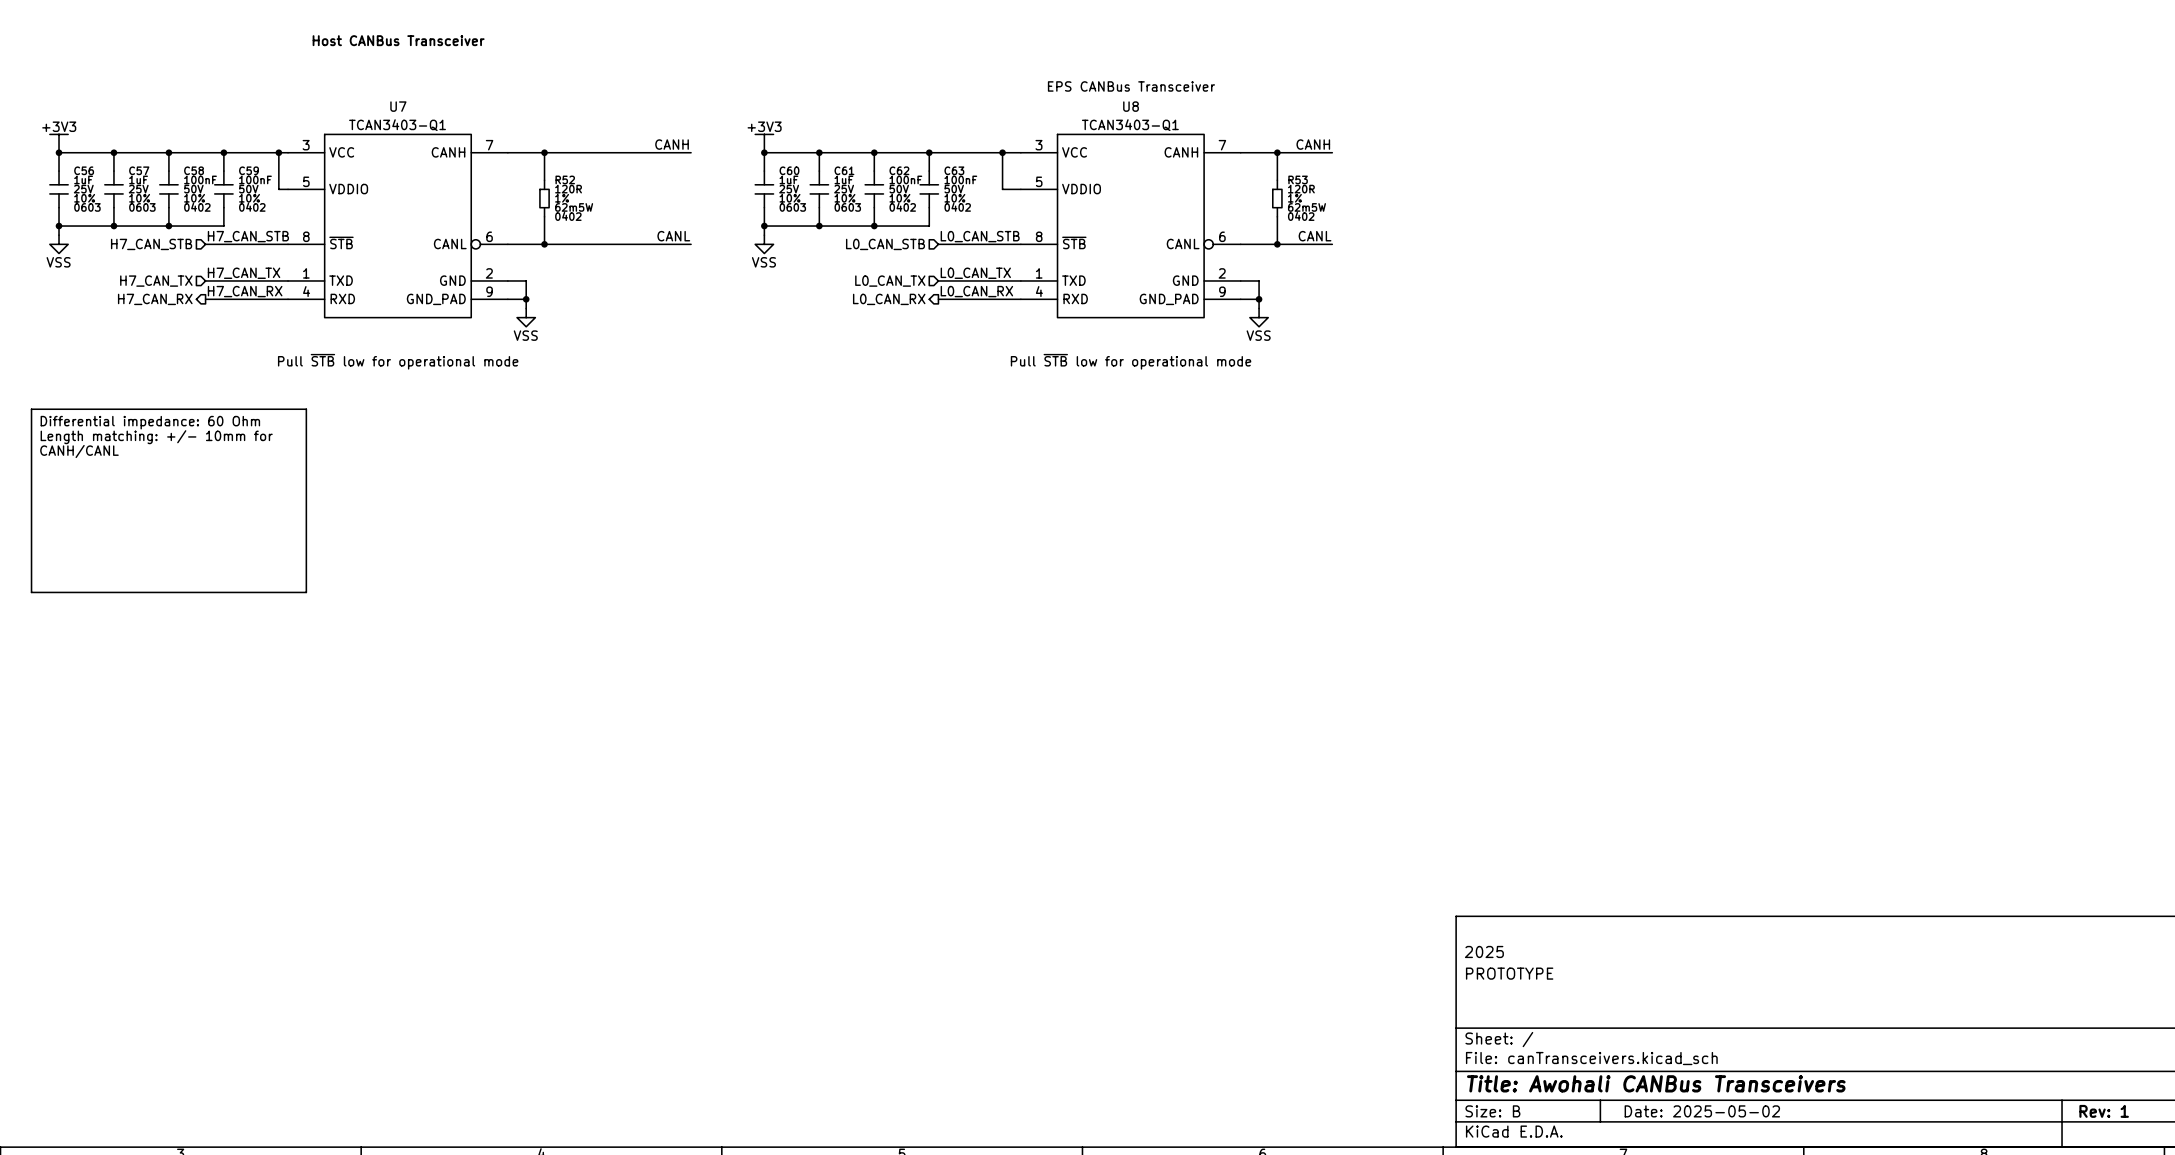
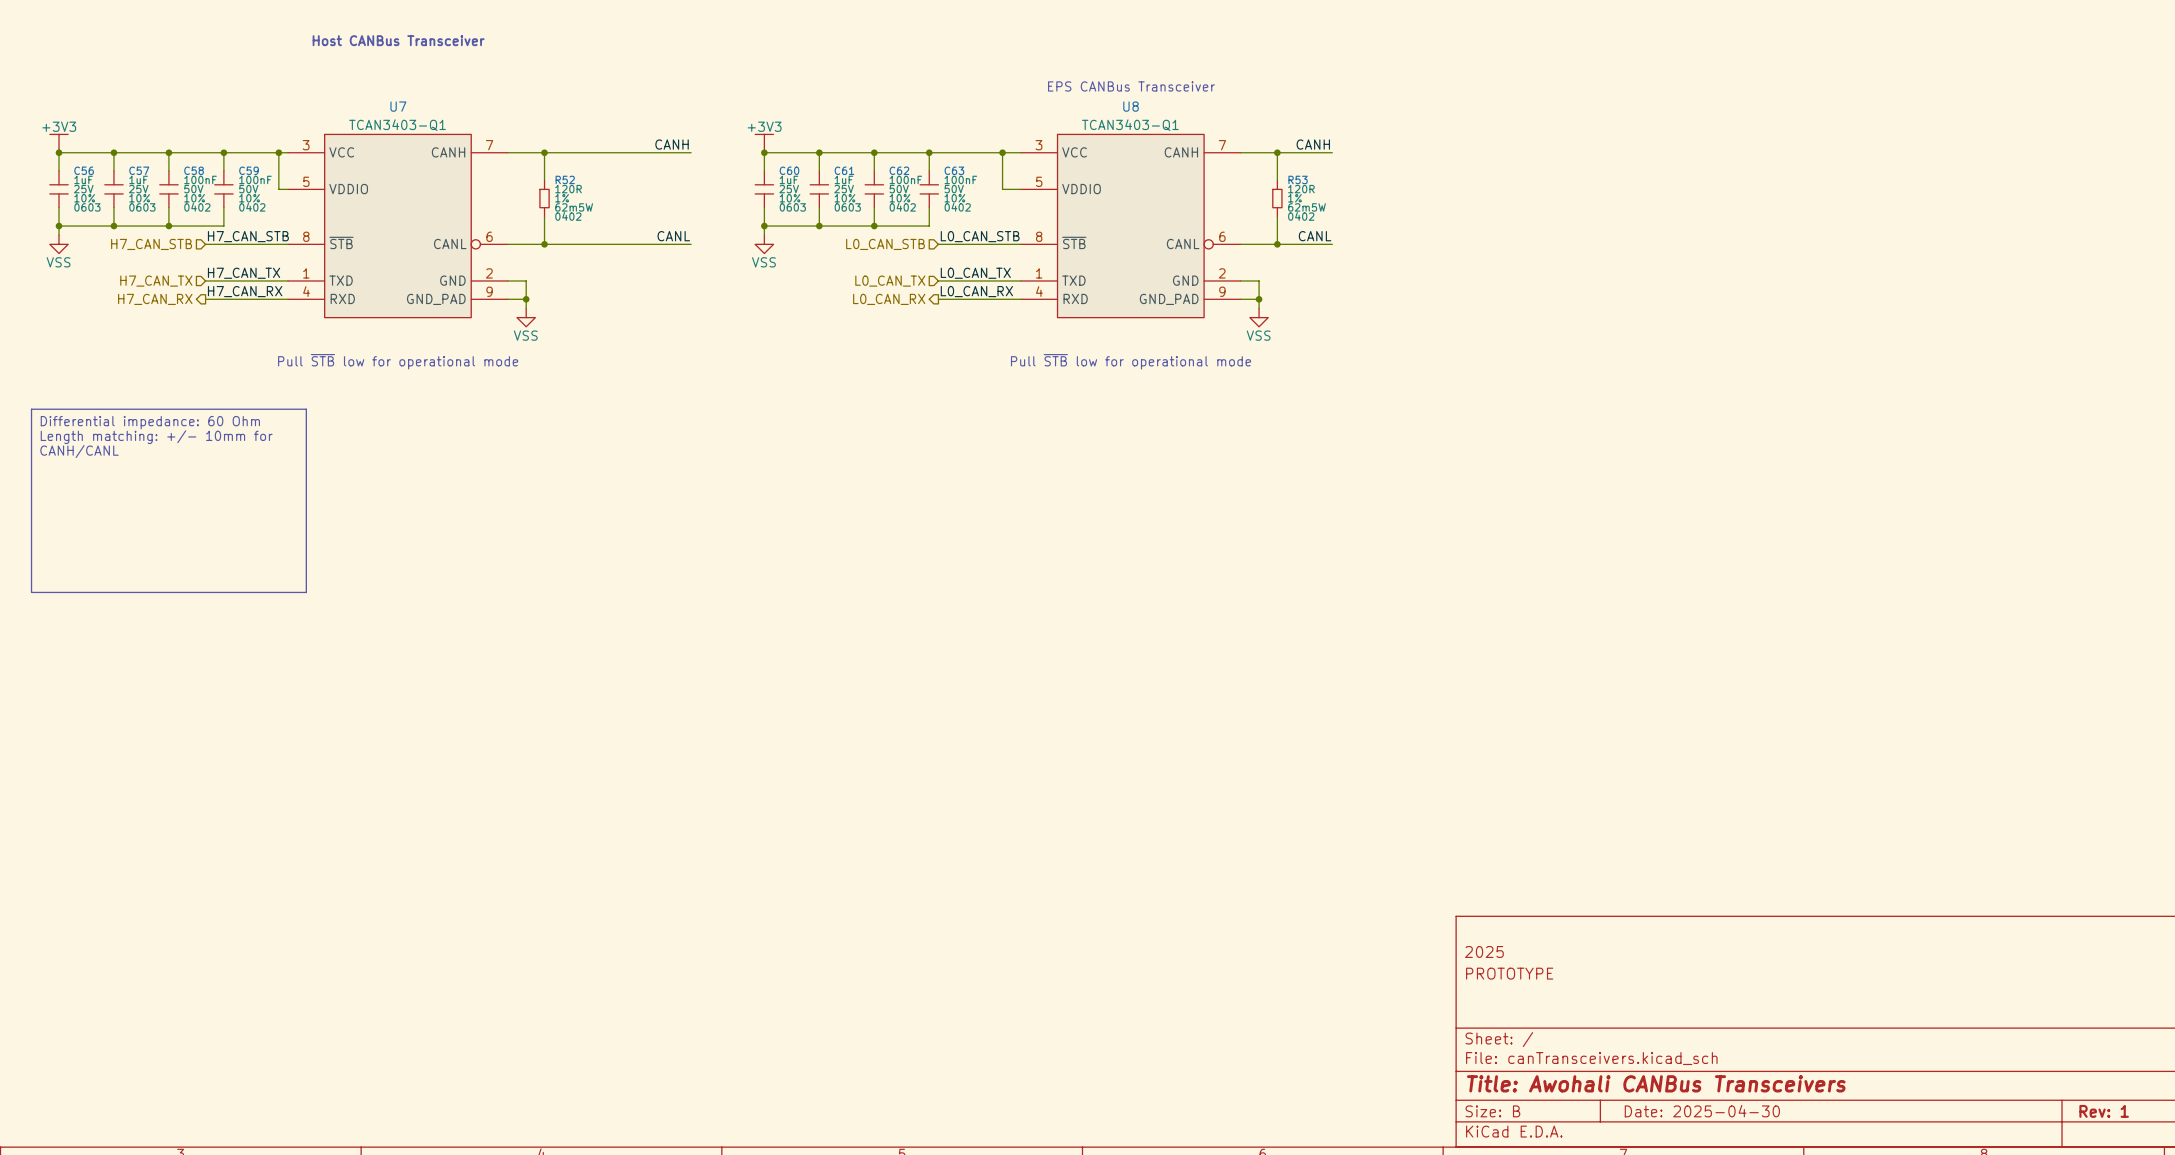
title block: Date: 2025-05-02 (1702, 1111) -> Date: 2025-04-30 (1702, 1111)

